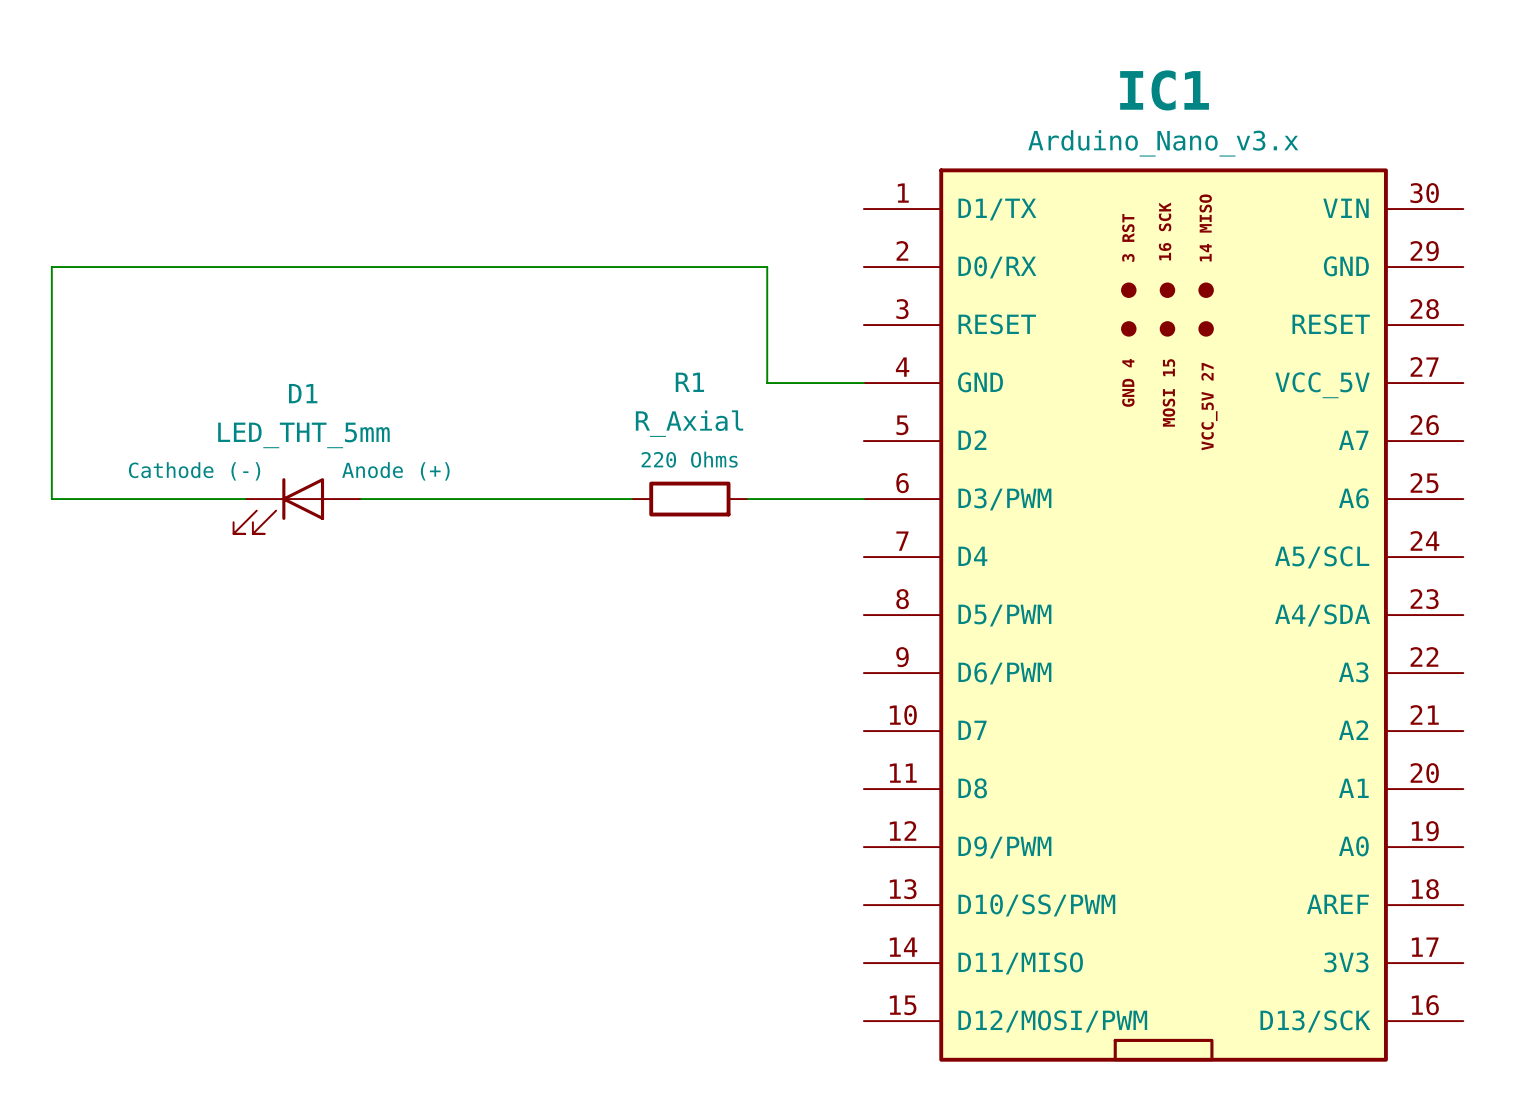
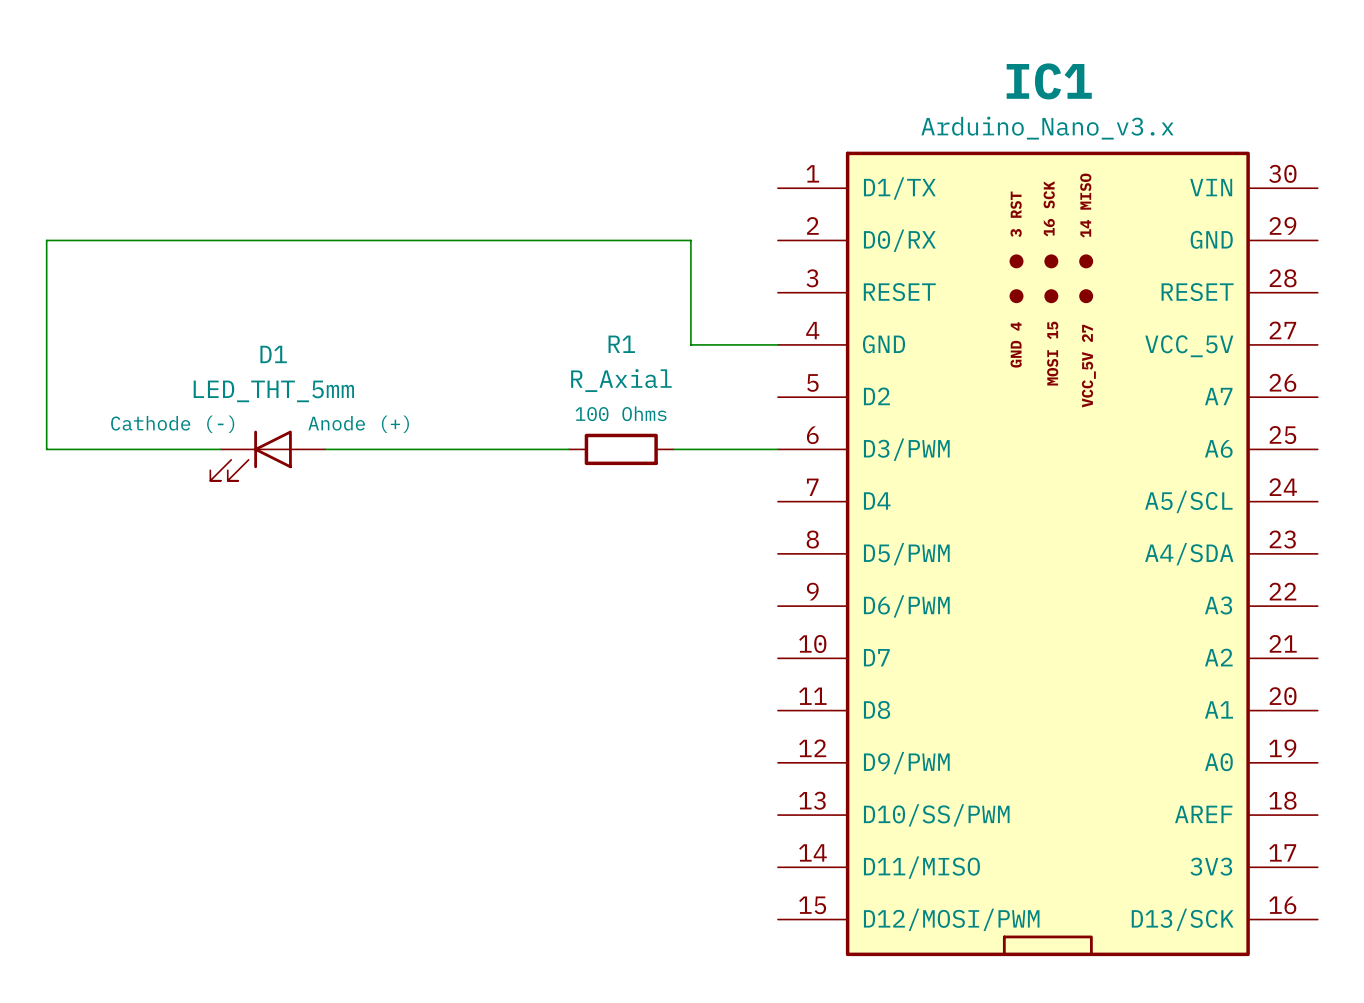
R1 text: 220 Ohms (689, 459) -> 100 Ohms (621, 413)

